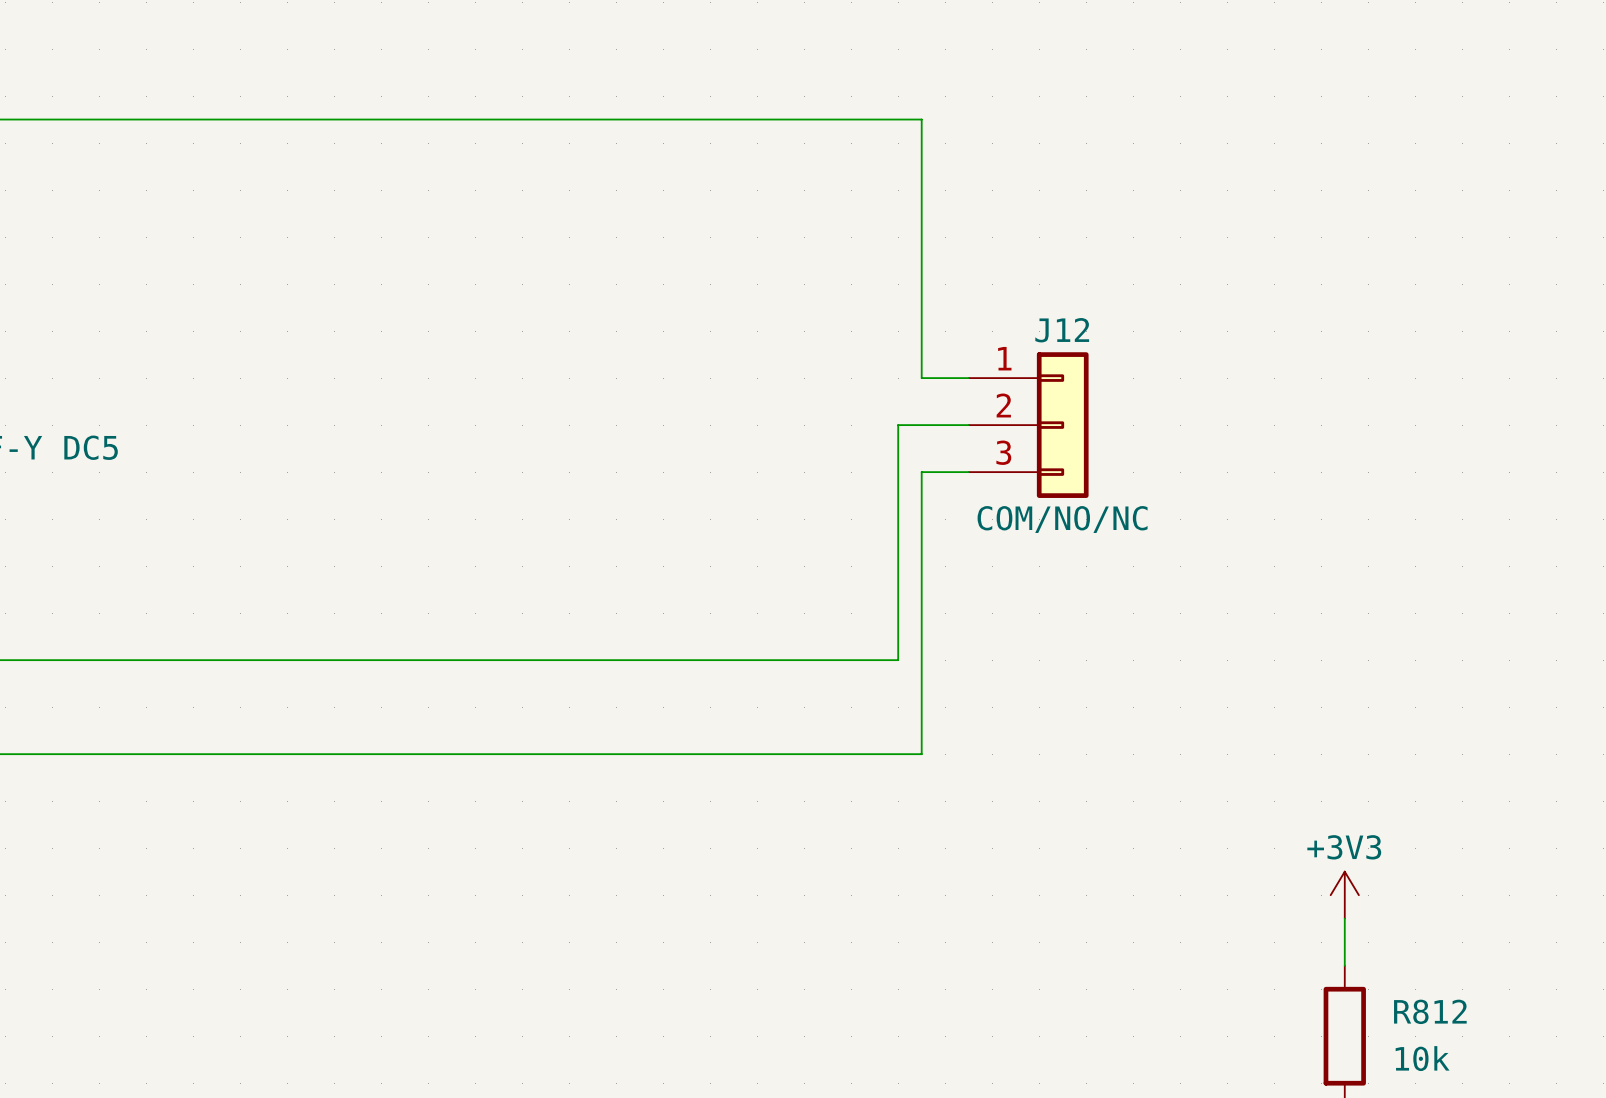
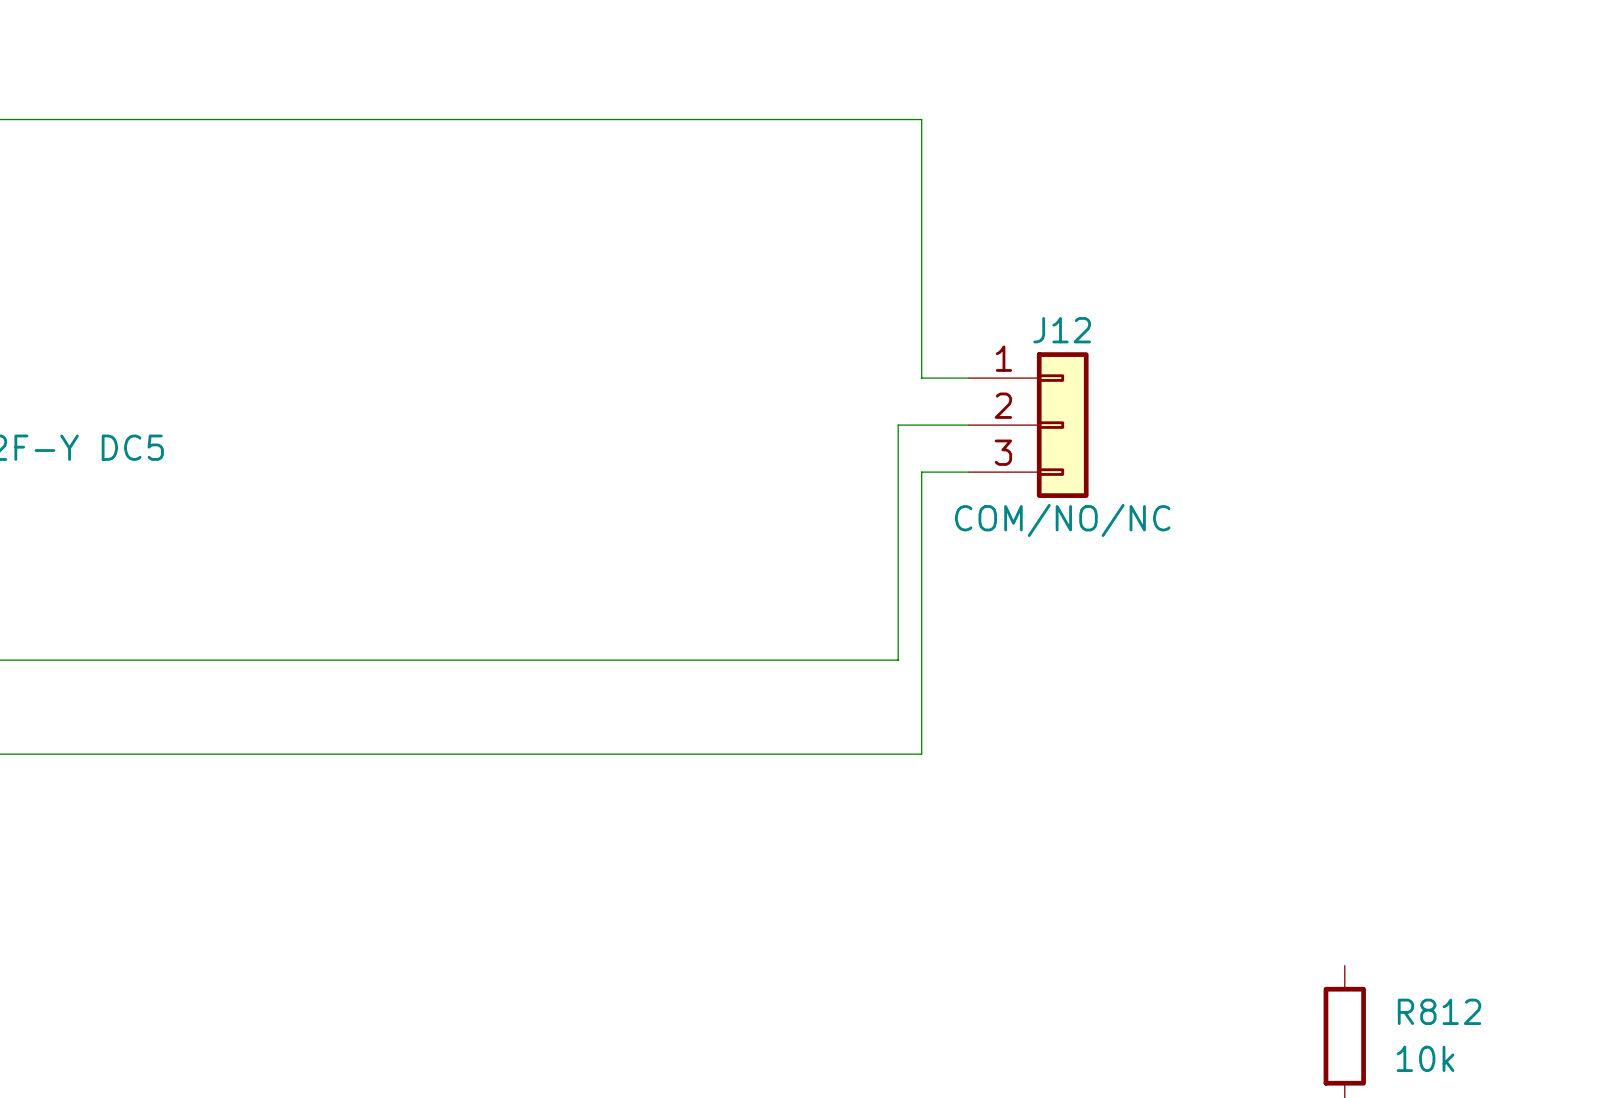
power symbol: +3V3 (1344, 895) -> none
wire: (1344, 918) (1344, 965) -> none

